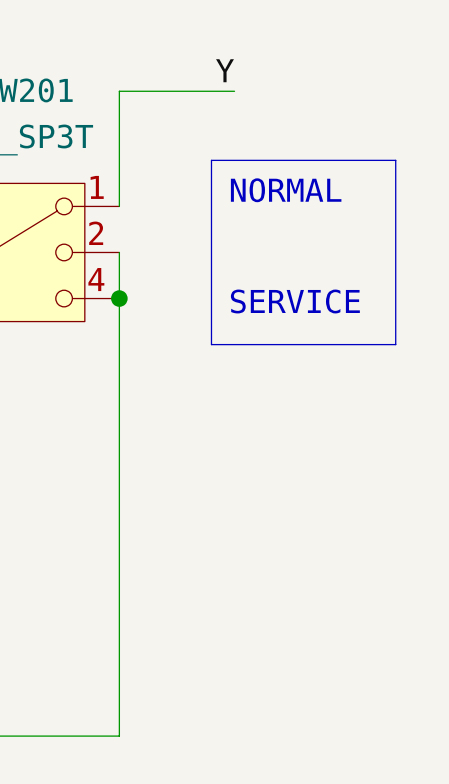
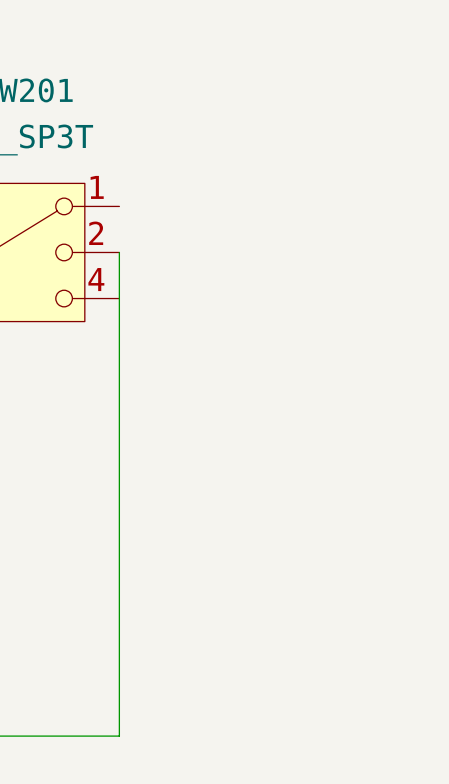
label: Y (225, 70) -> none
wire: (234, 91) (119, 91) (119, 206) -> none
line: (211, 160) (395, 160) (395, 344) (211, 344) (211, 160) -> none
text: NORMAL (286, 190) -> none
junction: (119, 298) -> none
text: SERVICE (295, 301) -> none

